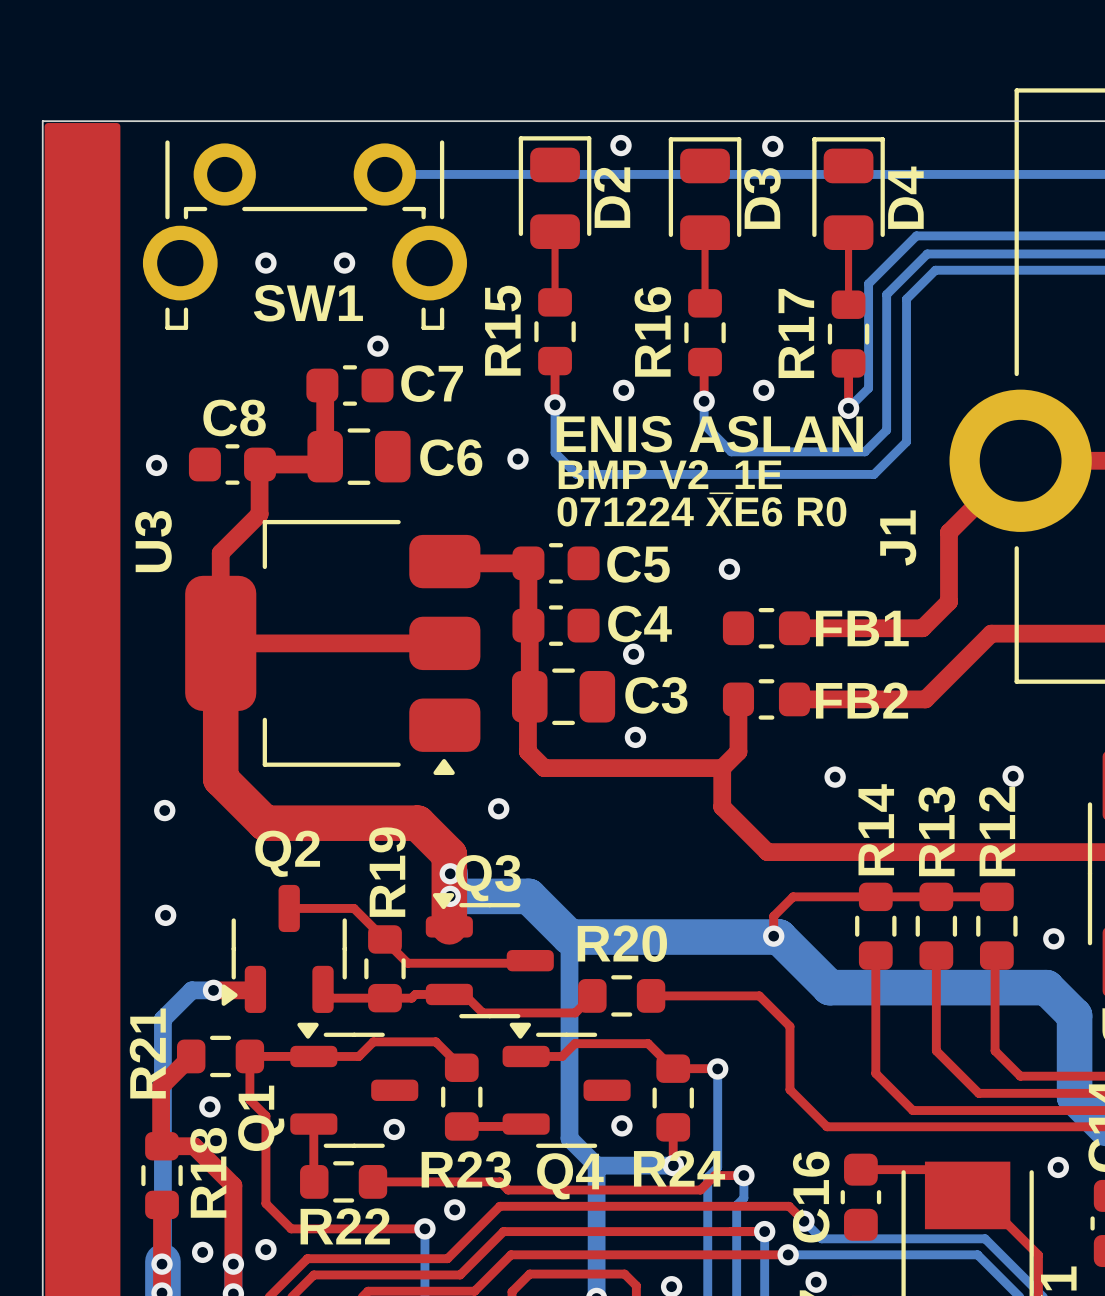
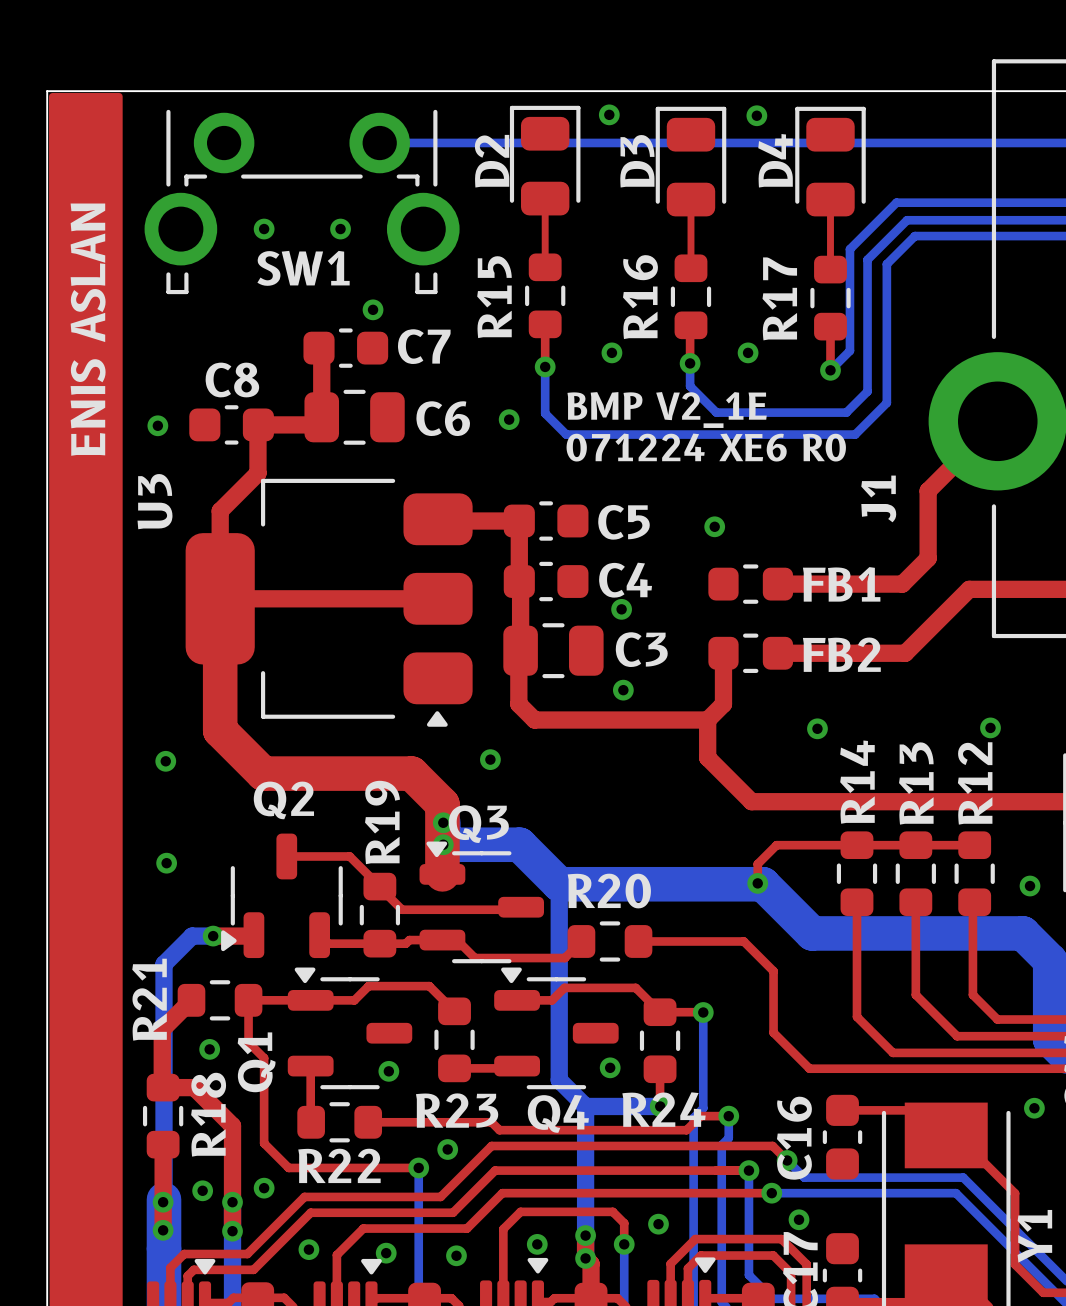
D2 name position: D2 (612, 197) -> D2 (492, 161)
D4 name position: D4 (905, 197) -> D4 (775, 160)
D3 name position: D3 (762, 198) -> D3 (637, 161)
text rotation: 0° (709, 434) -> 90° counterclockwise (88, 329)
text position: ENIS ASLAN (709, 434) -> ENIS ASLAN (88, 329)
text position: BMP V2_1E (670, 477) -> BMP V2_1E (667, 410)
text position: 071224 XE6 R0 (701, 511) -> 071224 XE6 R0 (706, 447)

